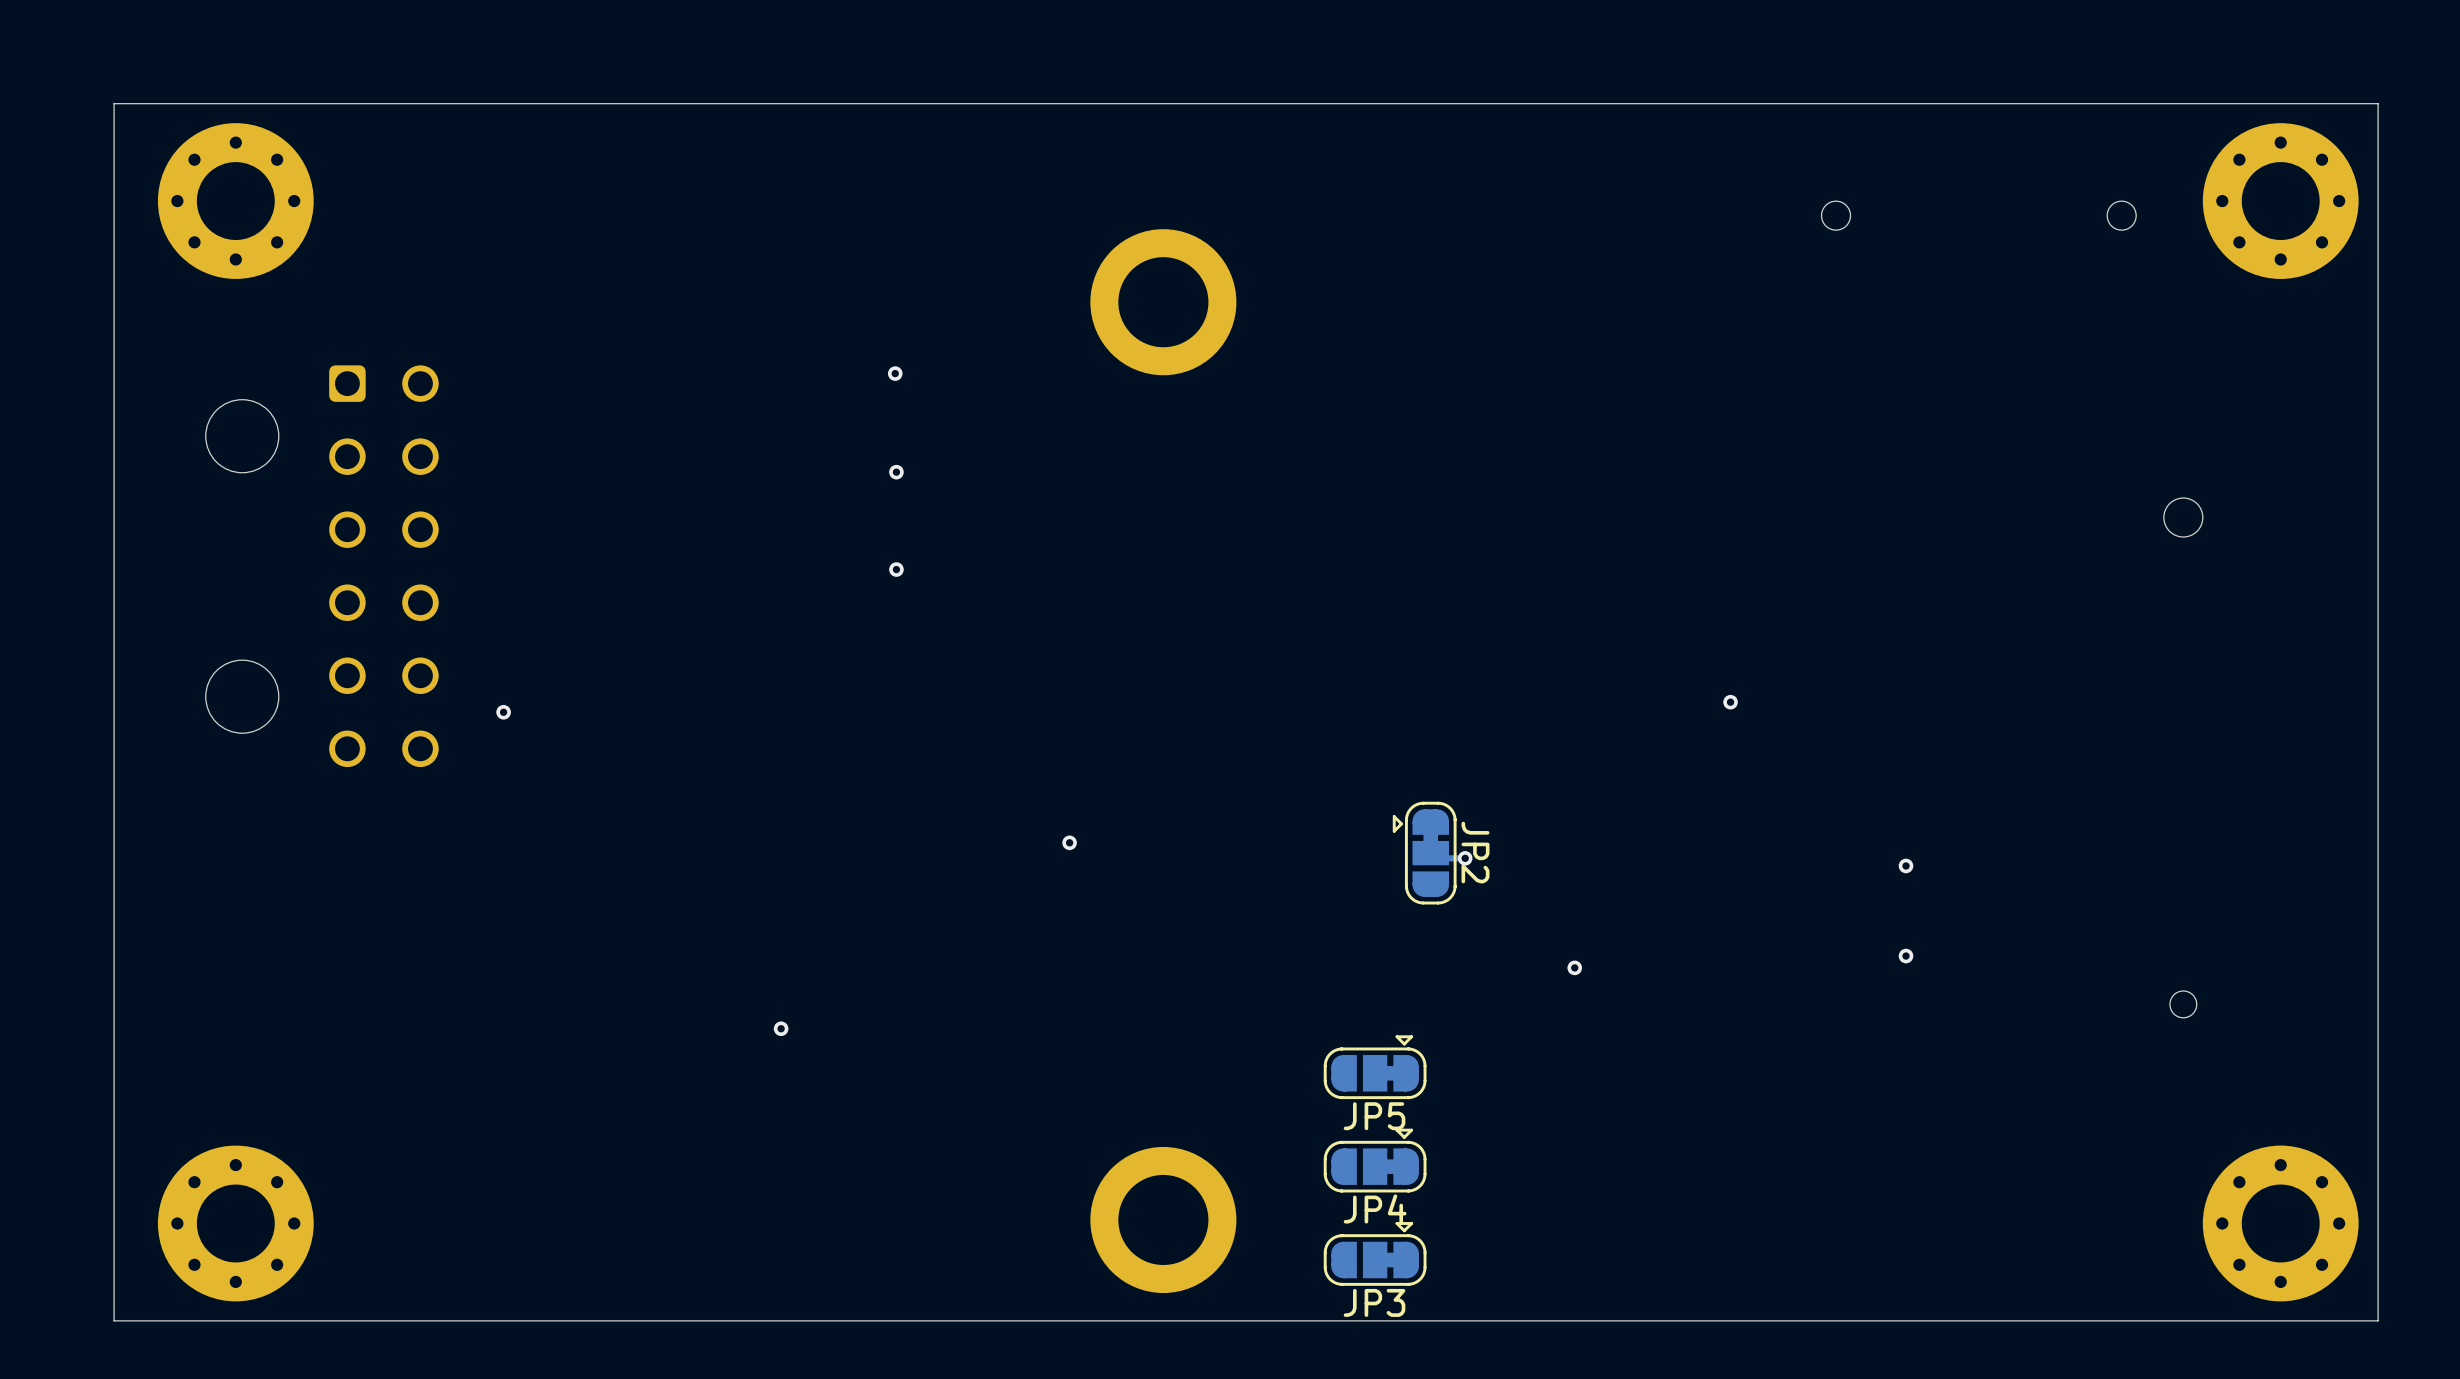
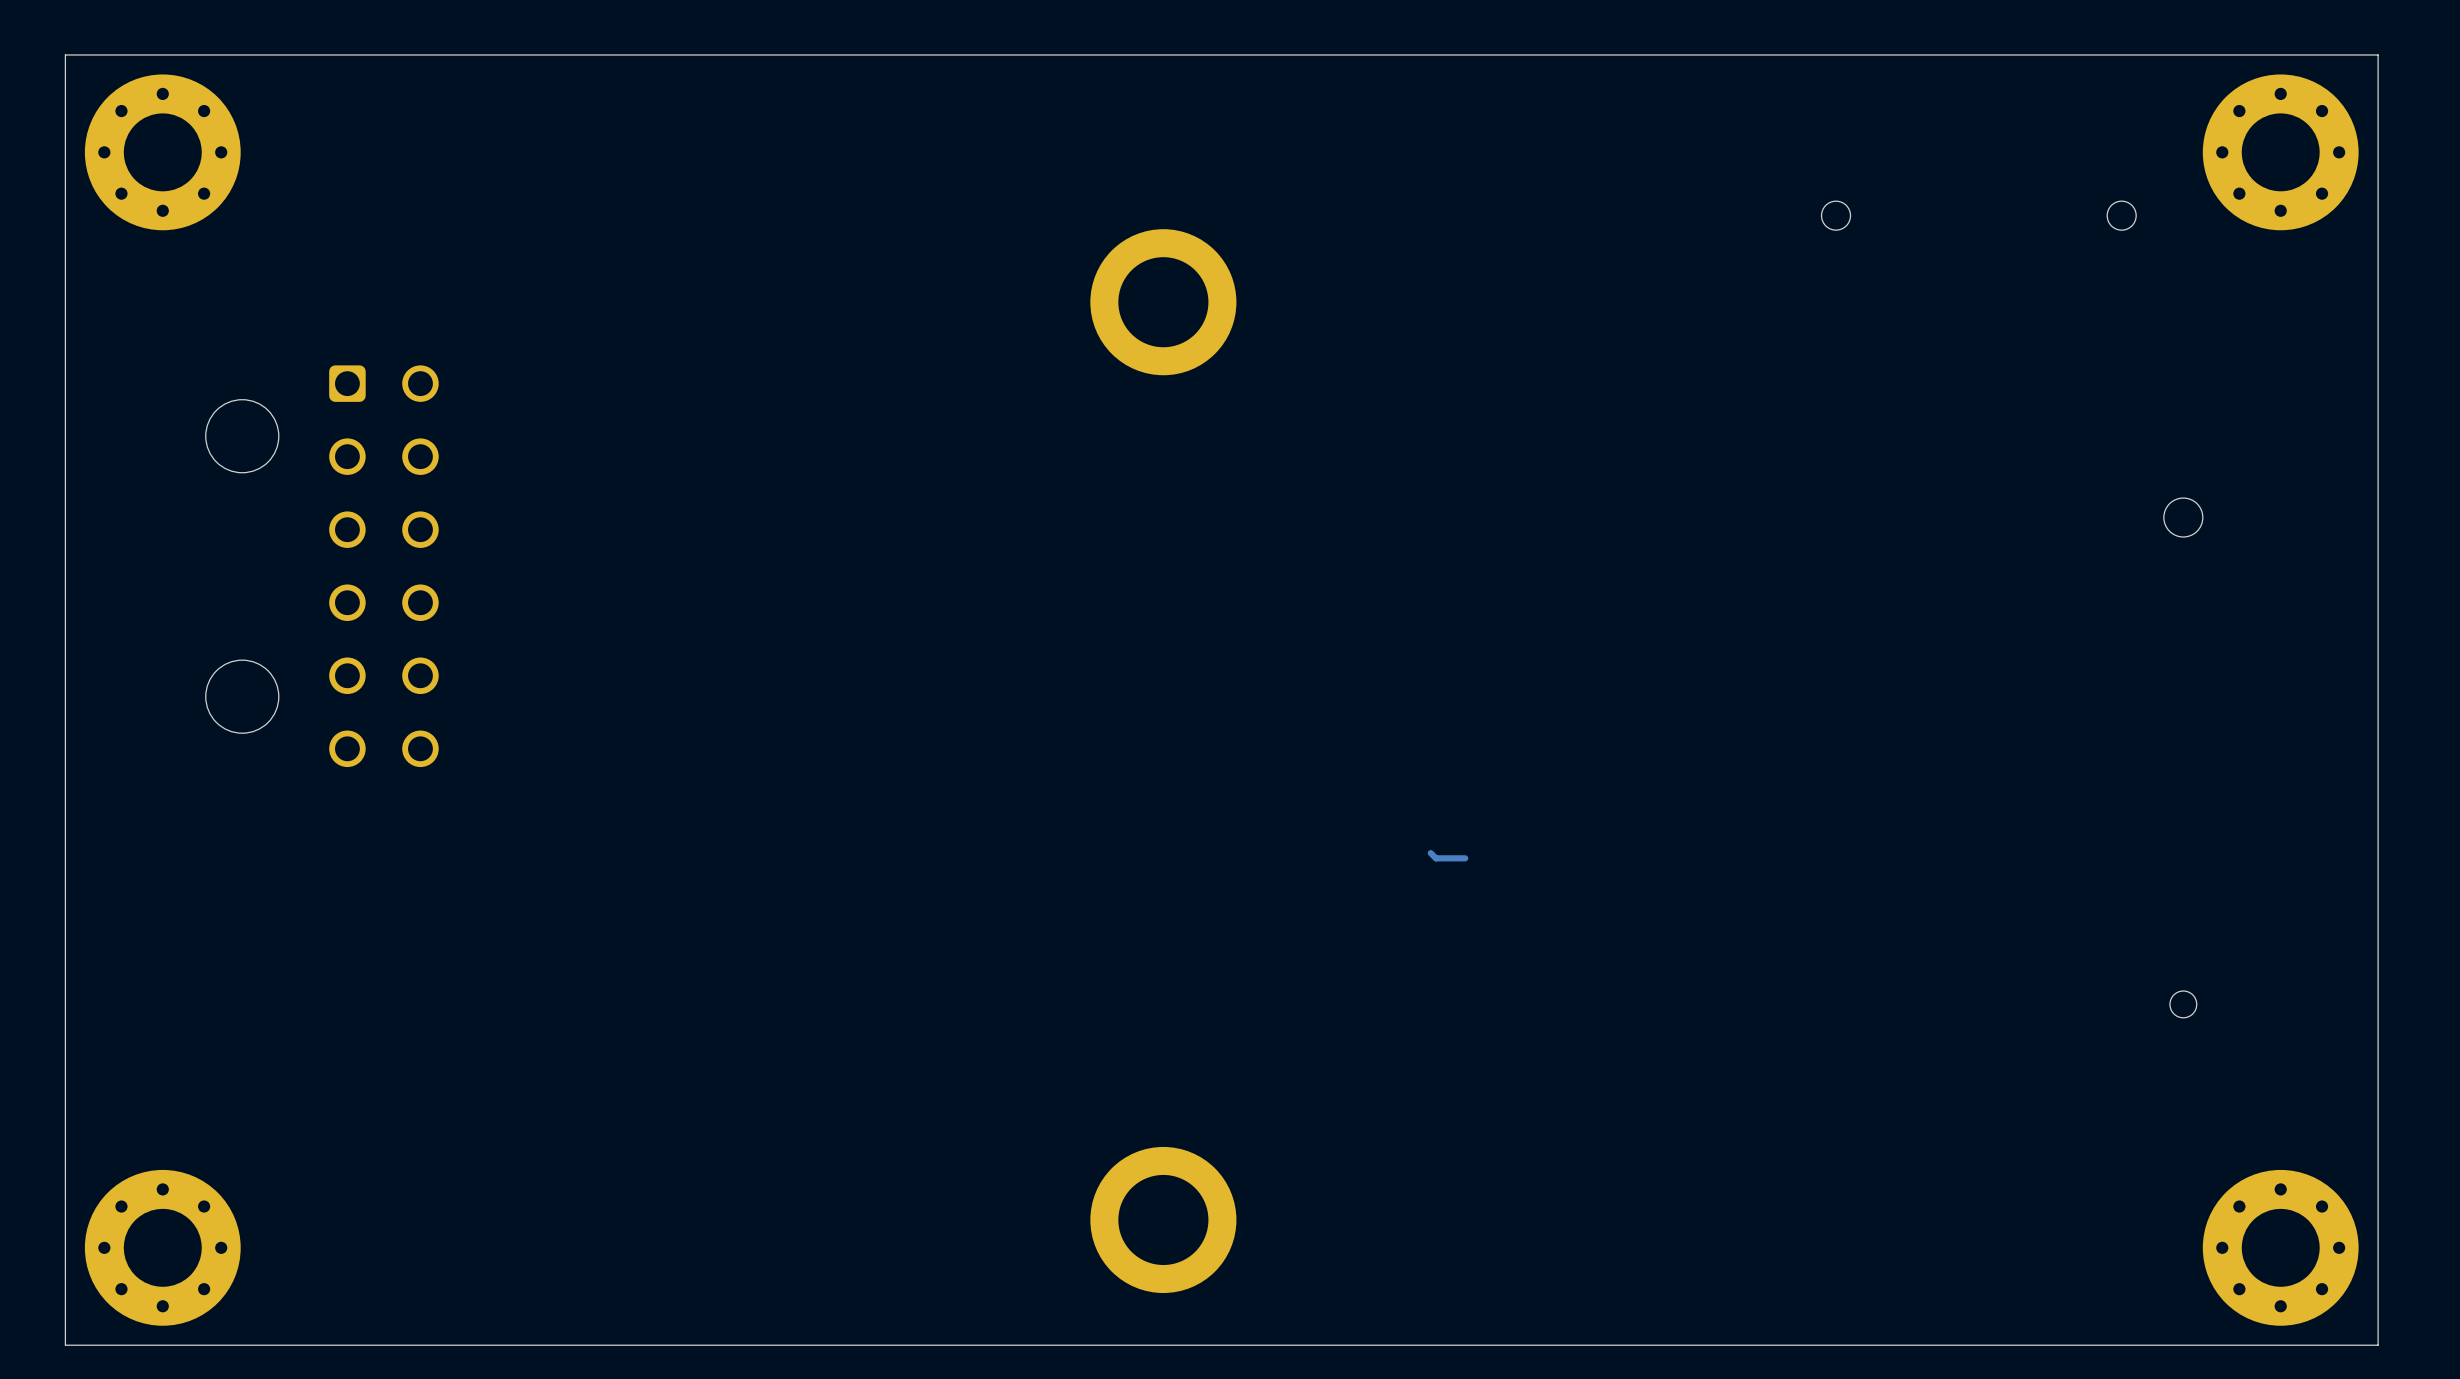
board edge: (2378, 103) (114, 103) (114, 1320) (2378, 1320) -> (2378, 103) (2378, 54) (65, 54) (65, 1345) (2378, 1345) (2378, 1320)
part position: (235, 201) -> (162, 152)
part position: (2280, 201) -> (2280, 152)
via: (895, 373) -> none
via: (896, 472) -> none
via: (896, 569) -> none
via: (1730, 702) -> none
via: (503, 712) -> none
via: (1069, 842) -> none
JP2: (1424, 853) -> none
via: (1465, 858) -> none
via: (1906, 865) -> none
via: (1906, 956) -> none
via: (1574, 967) -> none
via: (781, 1028) -> none
JP5: (1375, 1067) -> none
JP4: (1375, 1160) -> none
part position: (235, 1223) -> (162, 1247)
part position: (2280, 1223) -> (2280, 1247)
JP3: (1375, 1253) -> none

